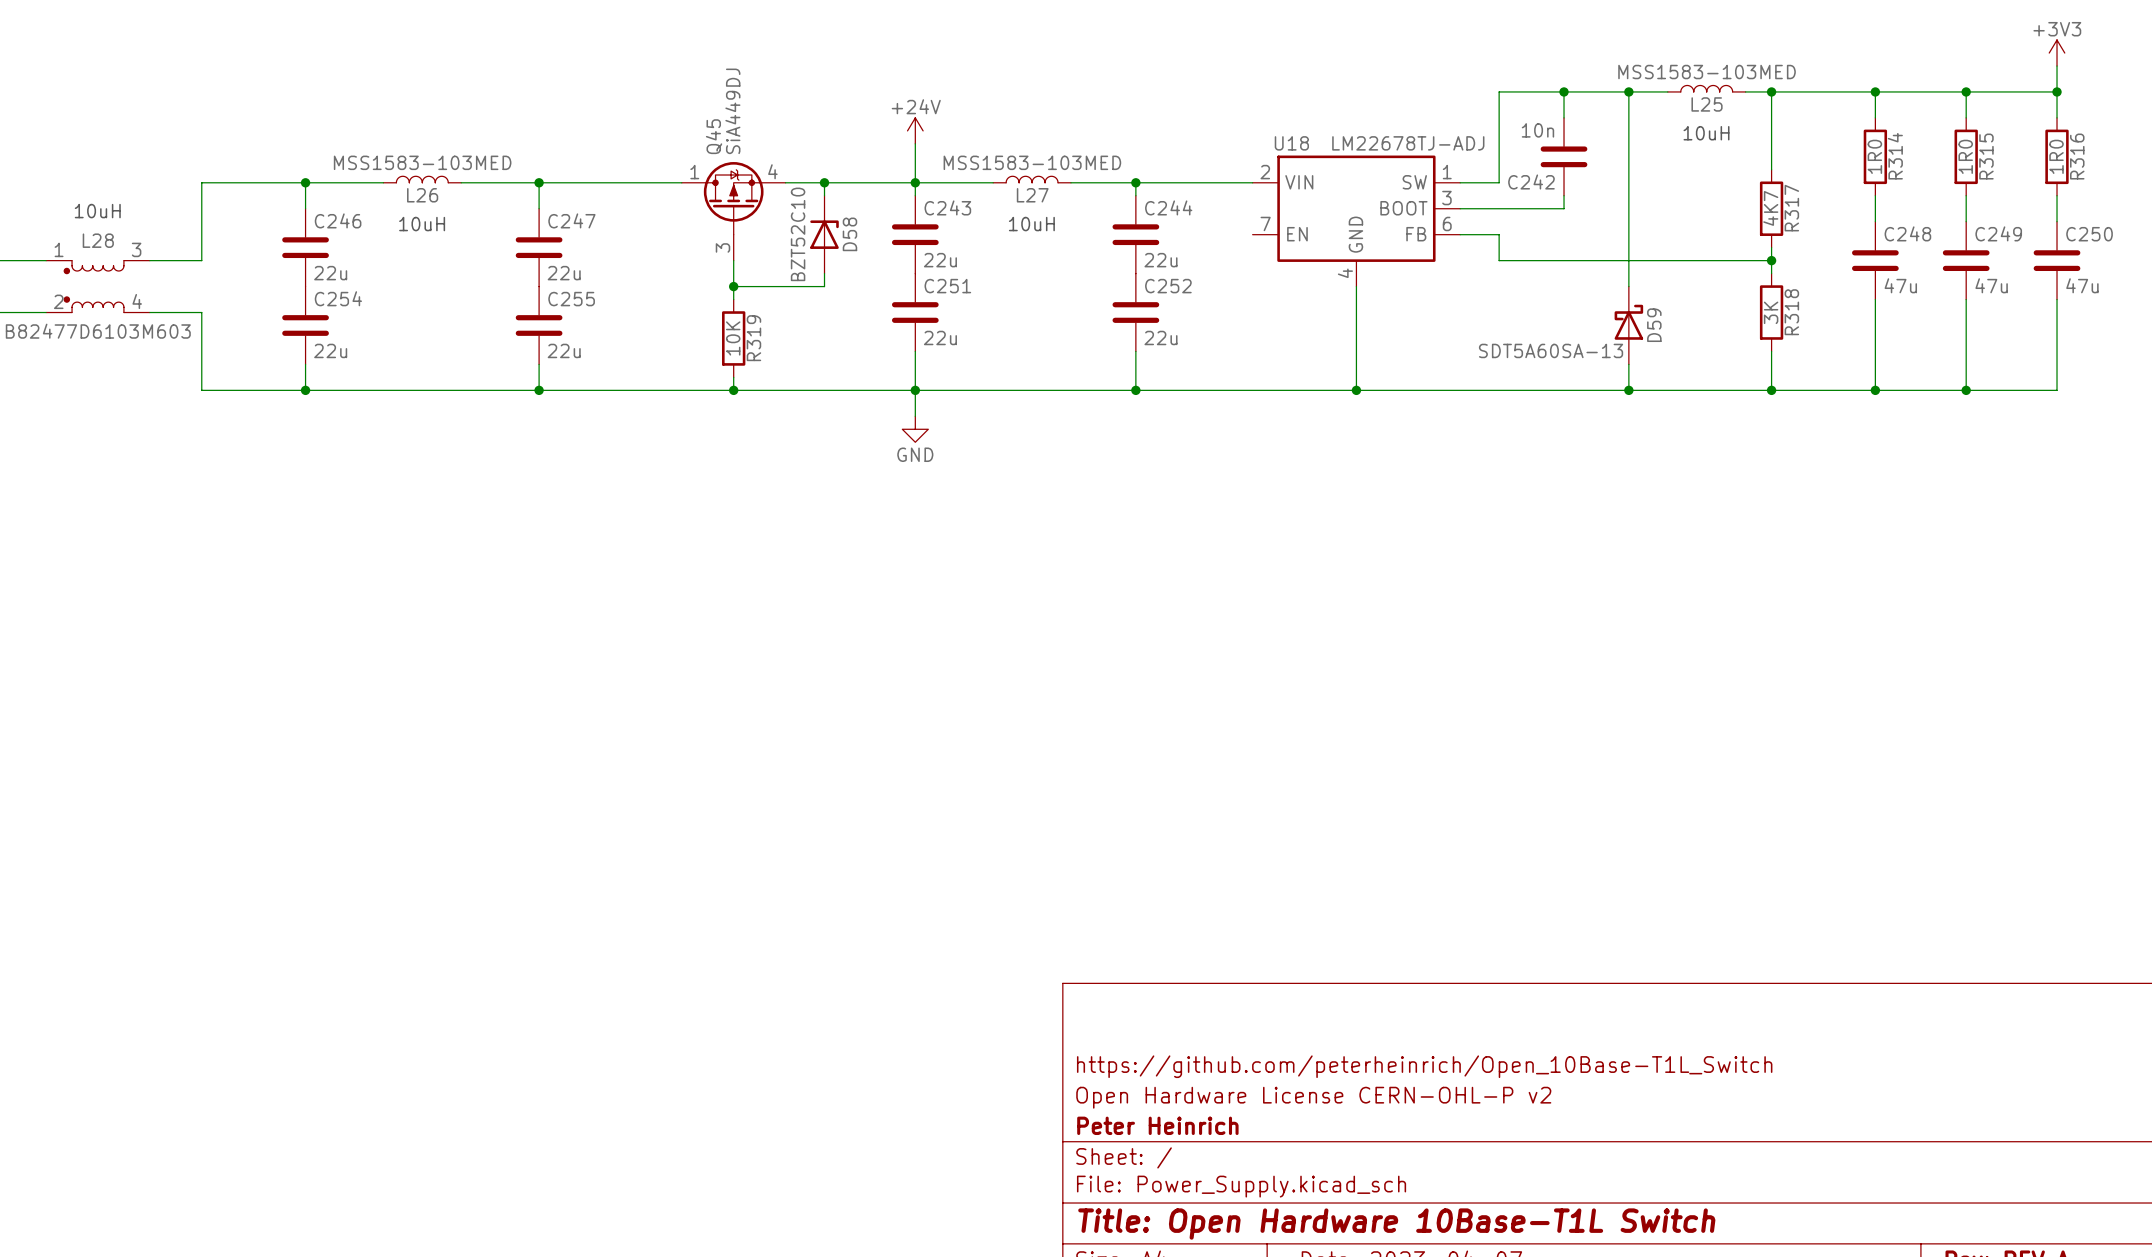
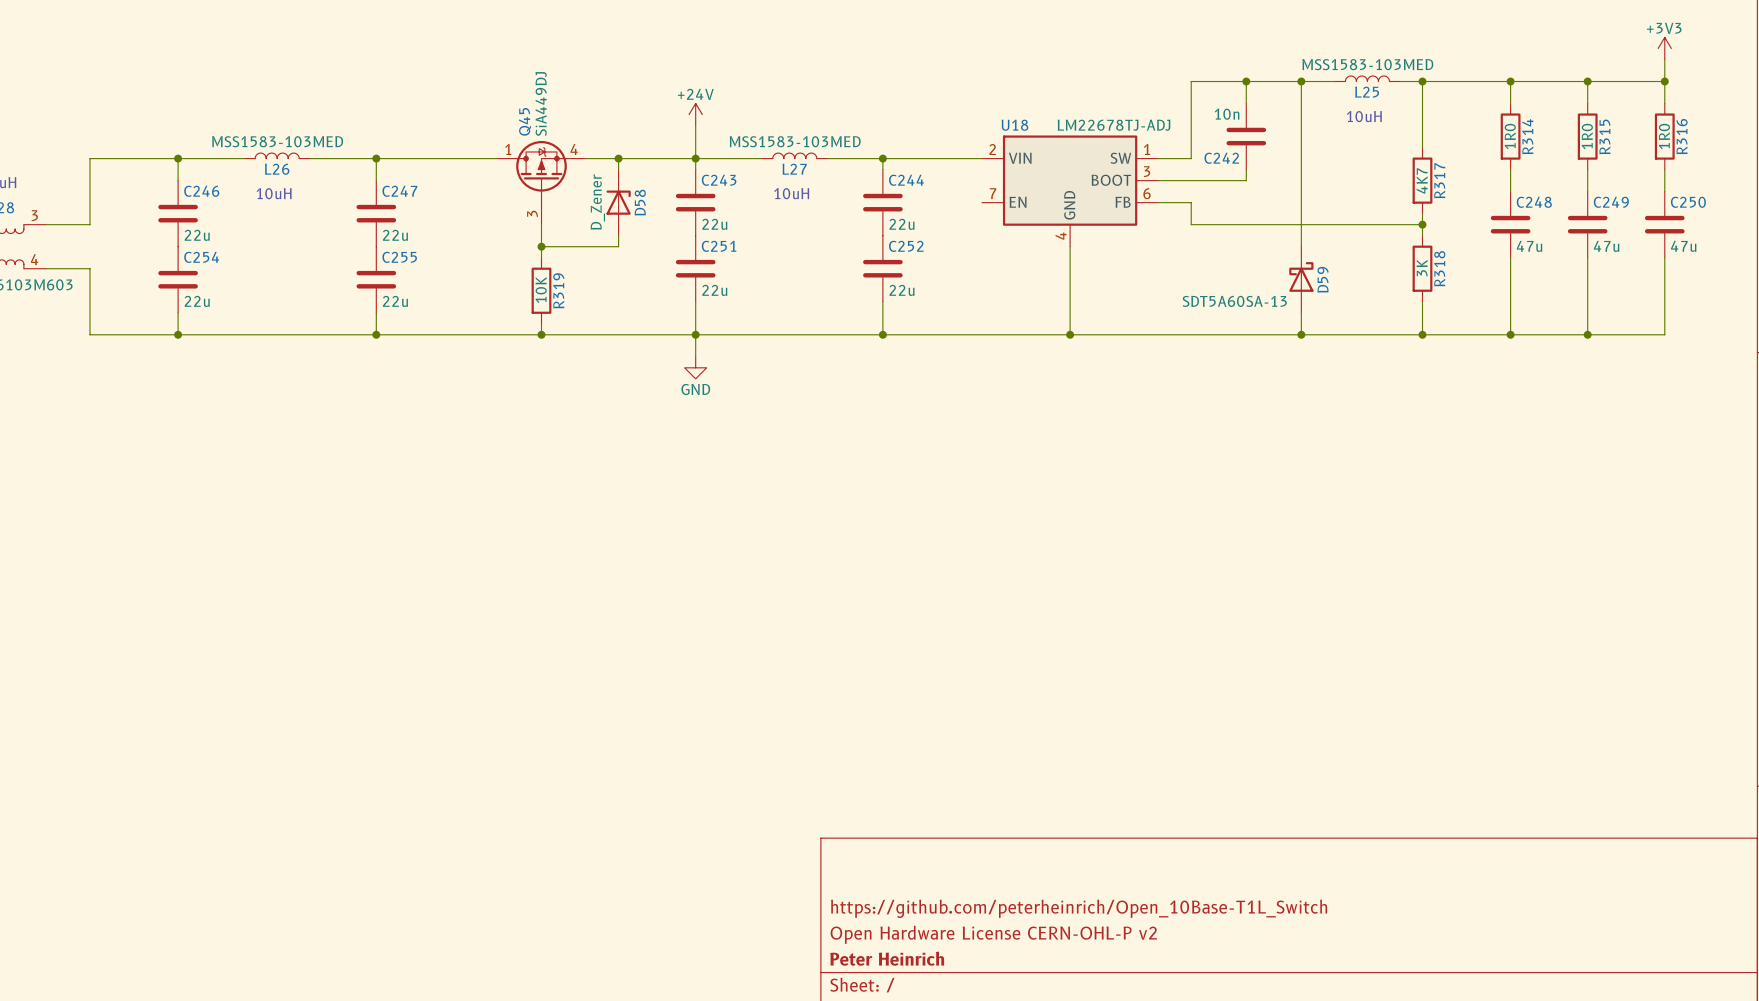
D58 value: BZT52C10 (798, 234) -> D_Zener (597, 202)

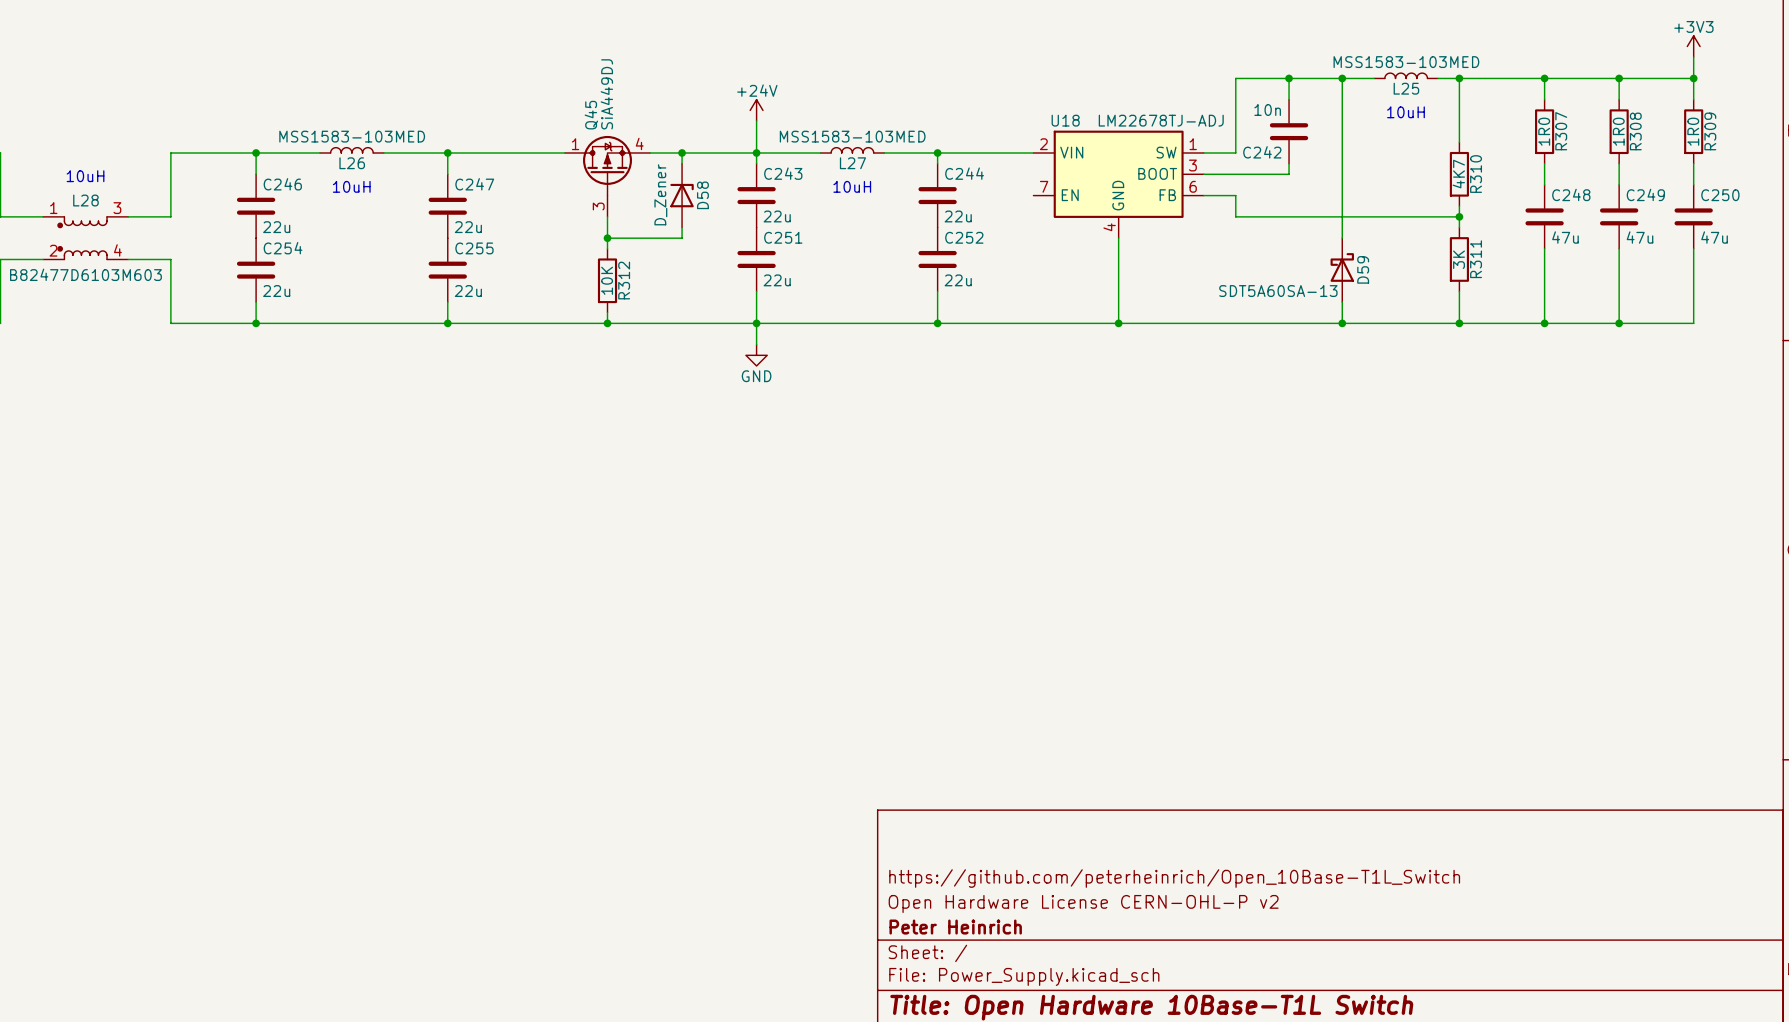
R314 name: R314 (1527, 136) -> R307 (1561, 131)
R315 name: R315 (1604, 136) -> R308 (1635, 131)
R316 name: R316 (1682, 136) -> R309 (1710, 131)
R317 name: R317 (1439, 180) -> R310 (1476, 174)
R318 name: R318 (1439, 268) -> R311 (1476, 259)
R319 name: R319 (558, 290) -> R312 (624, 280)

